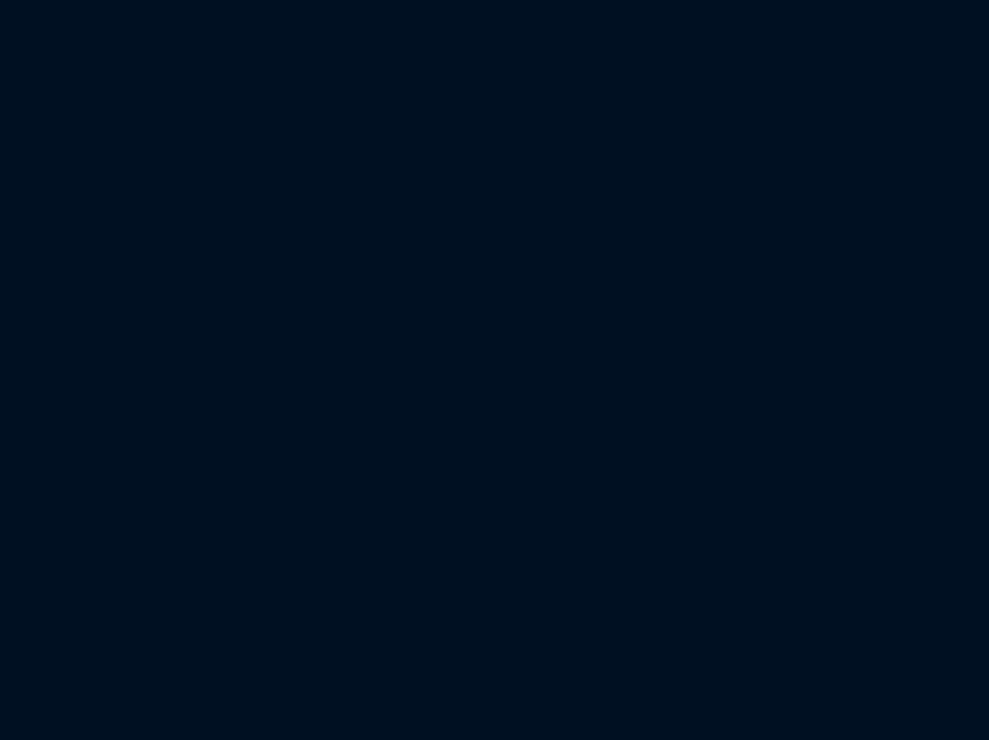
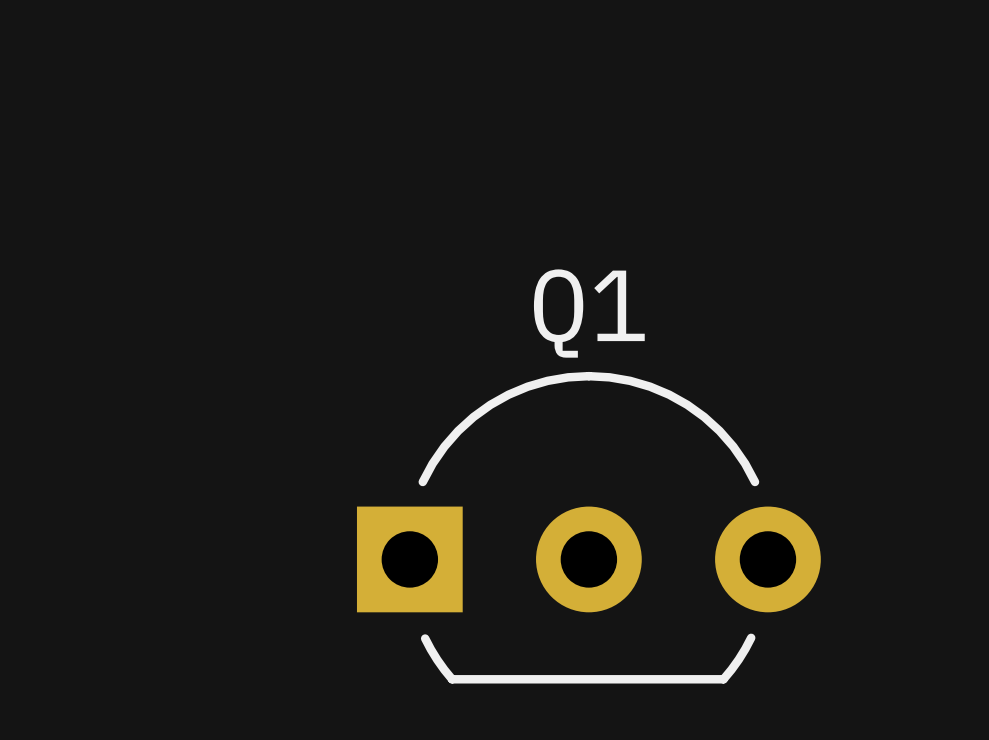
Q1: none -> (588, 527)

